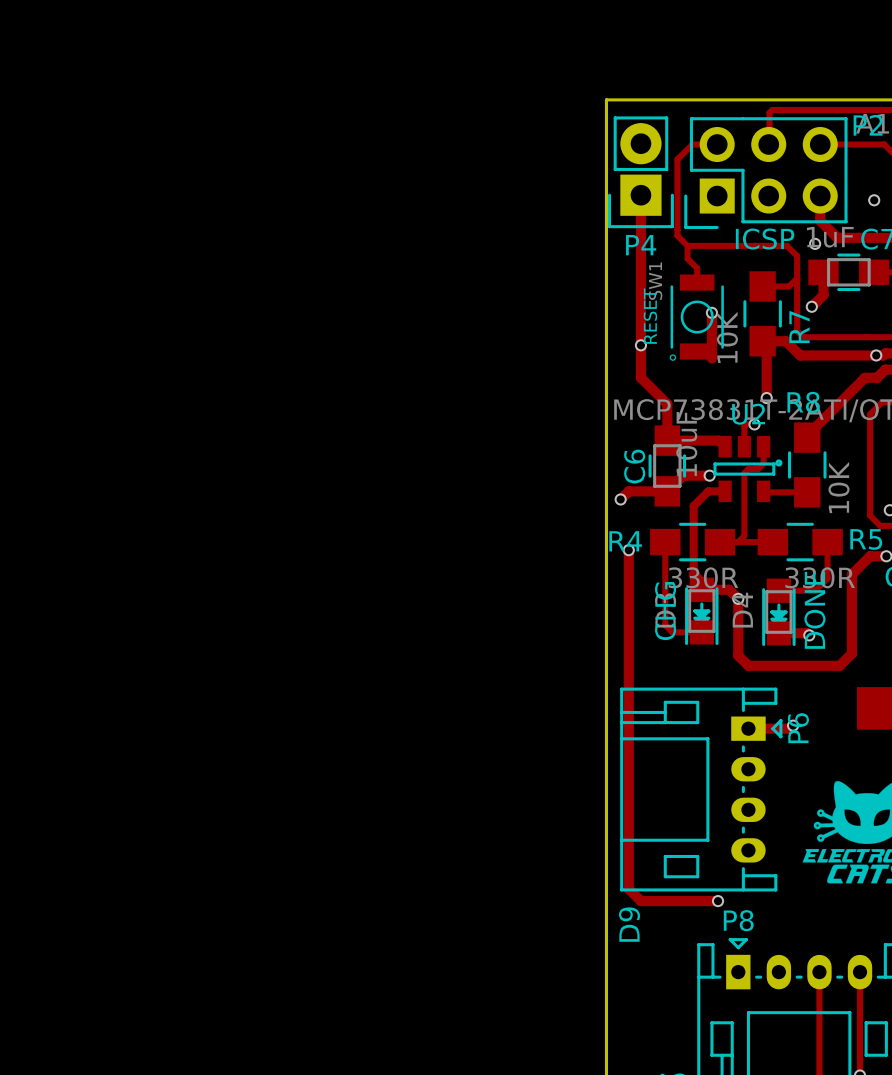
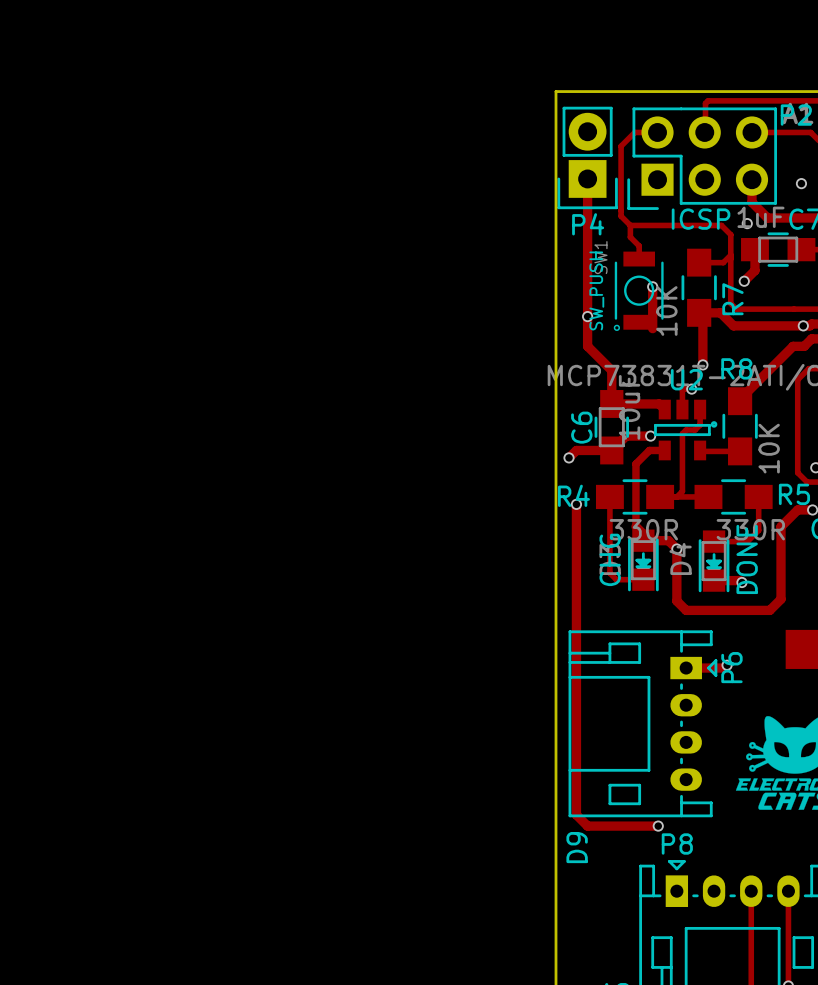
SW1 value: RESET (650, 316) -> SW_PUSH (596, 290)

